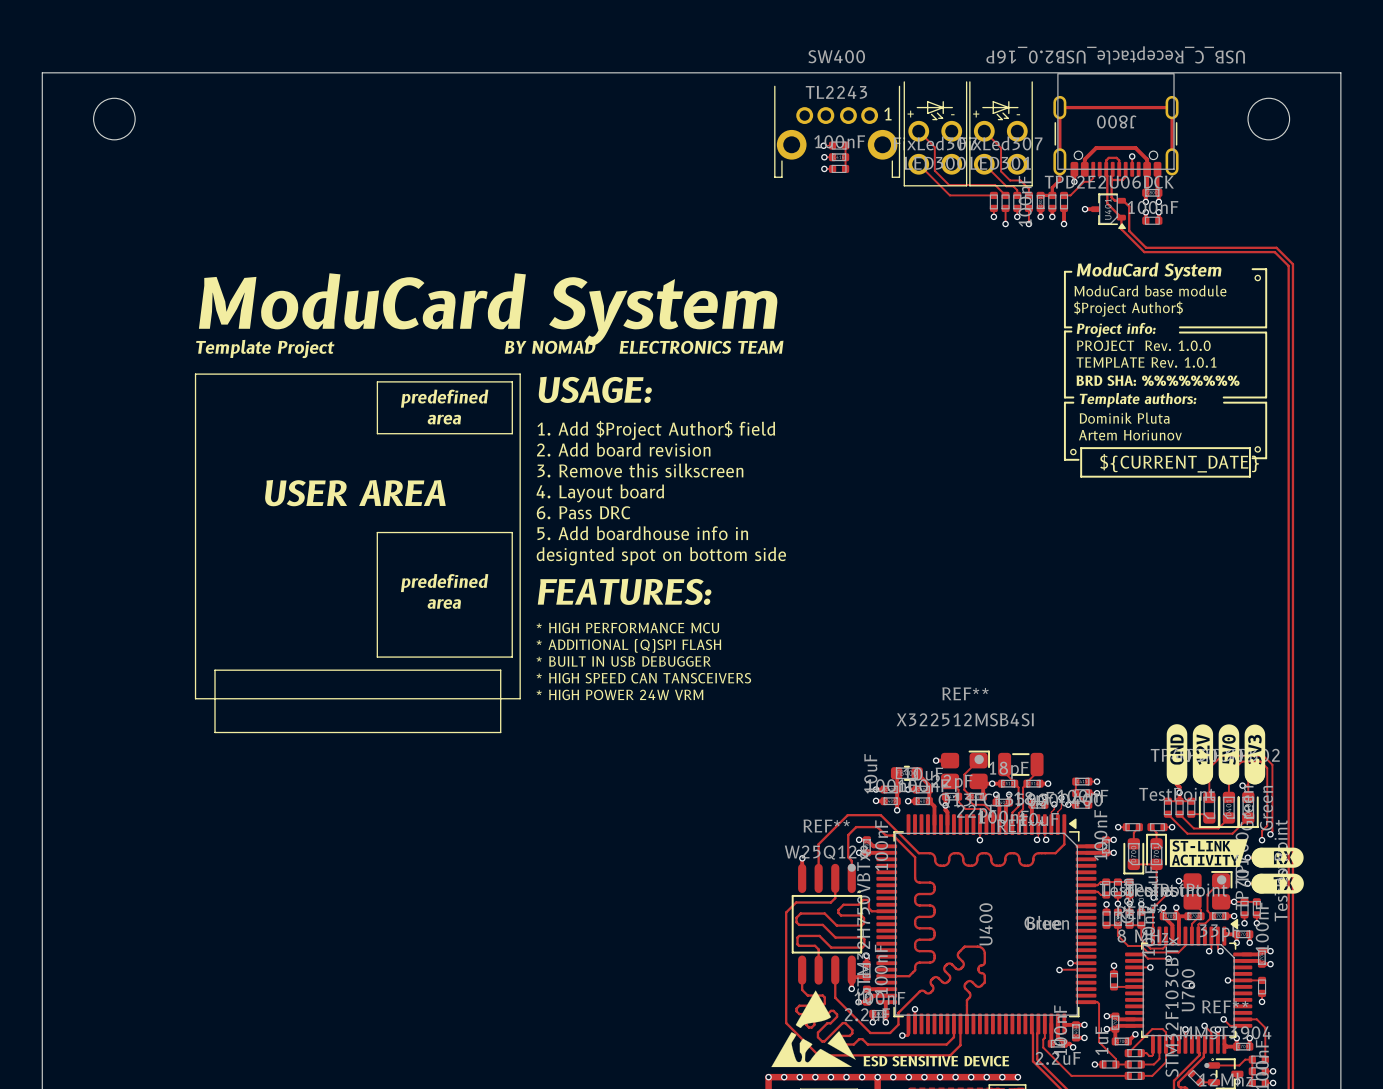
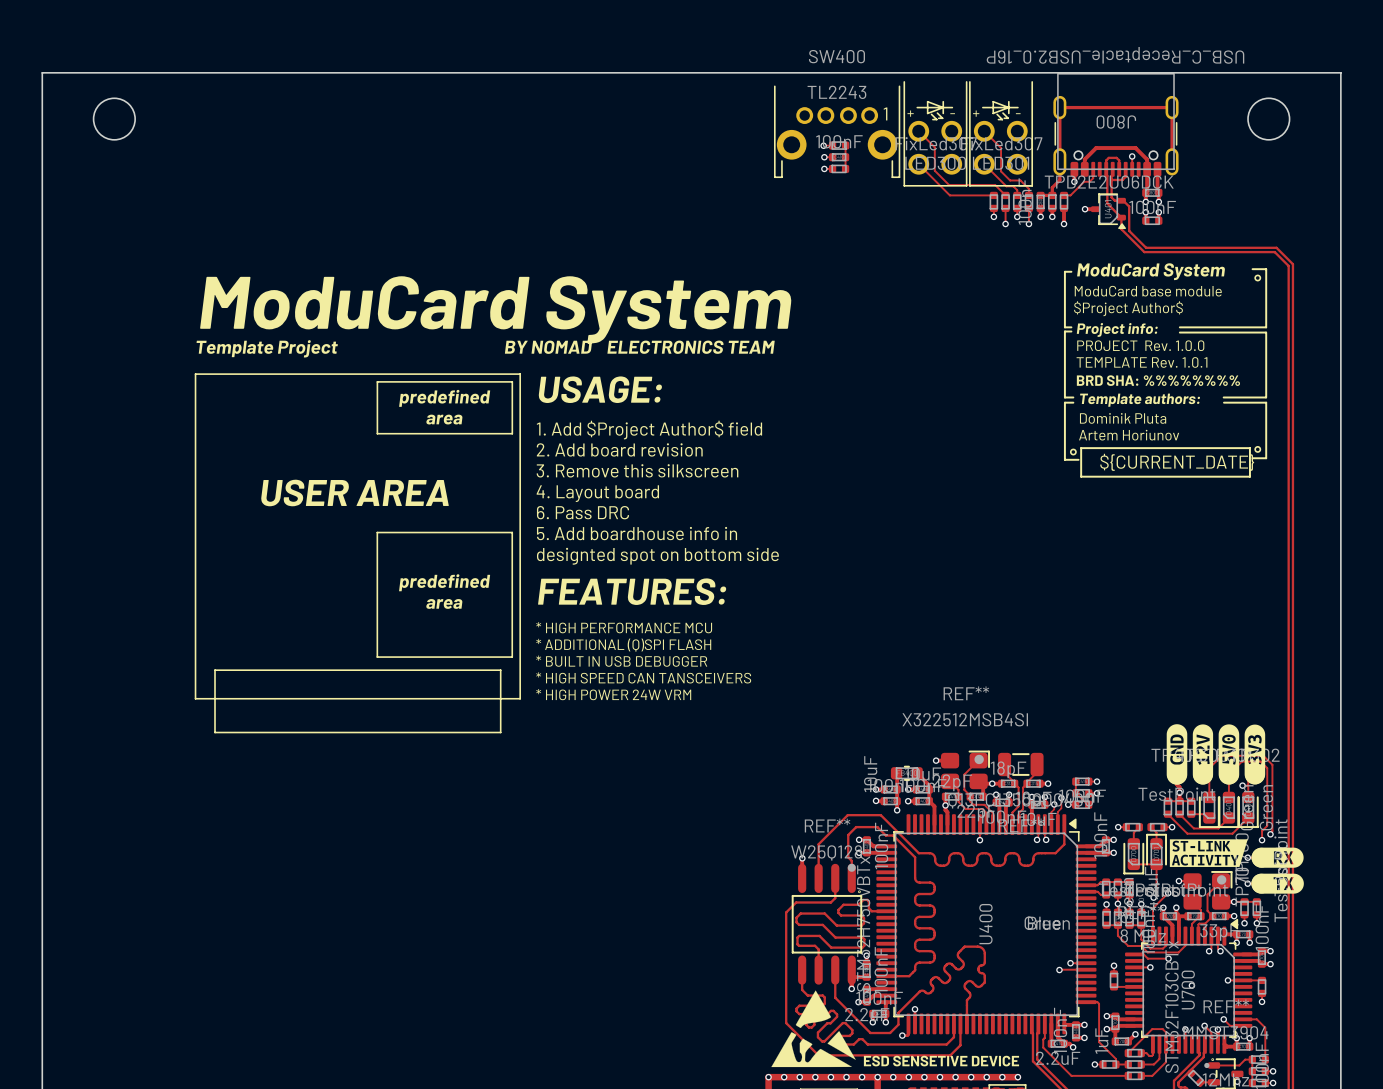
text: ESD SENSITIVE DEVICE (936, 1061) -> ESD SENSETIVE DEVICE (941, 1061)

